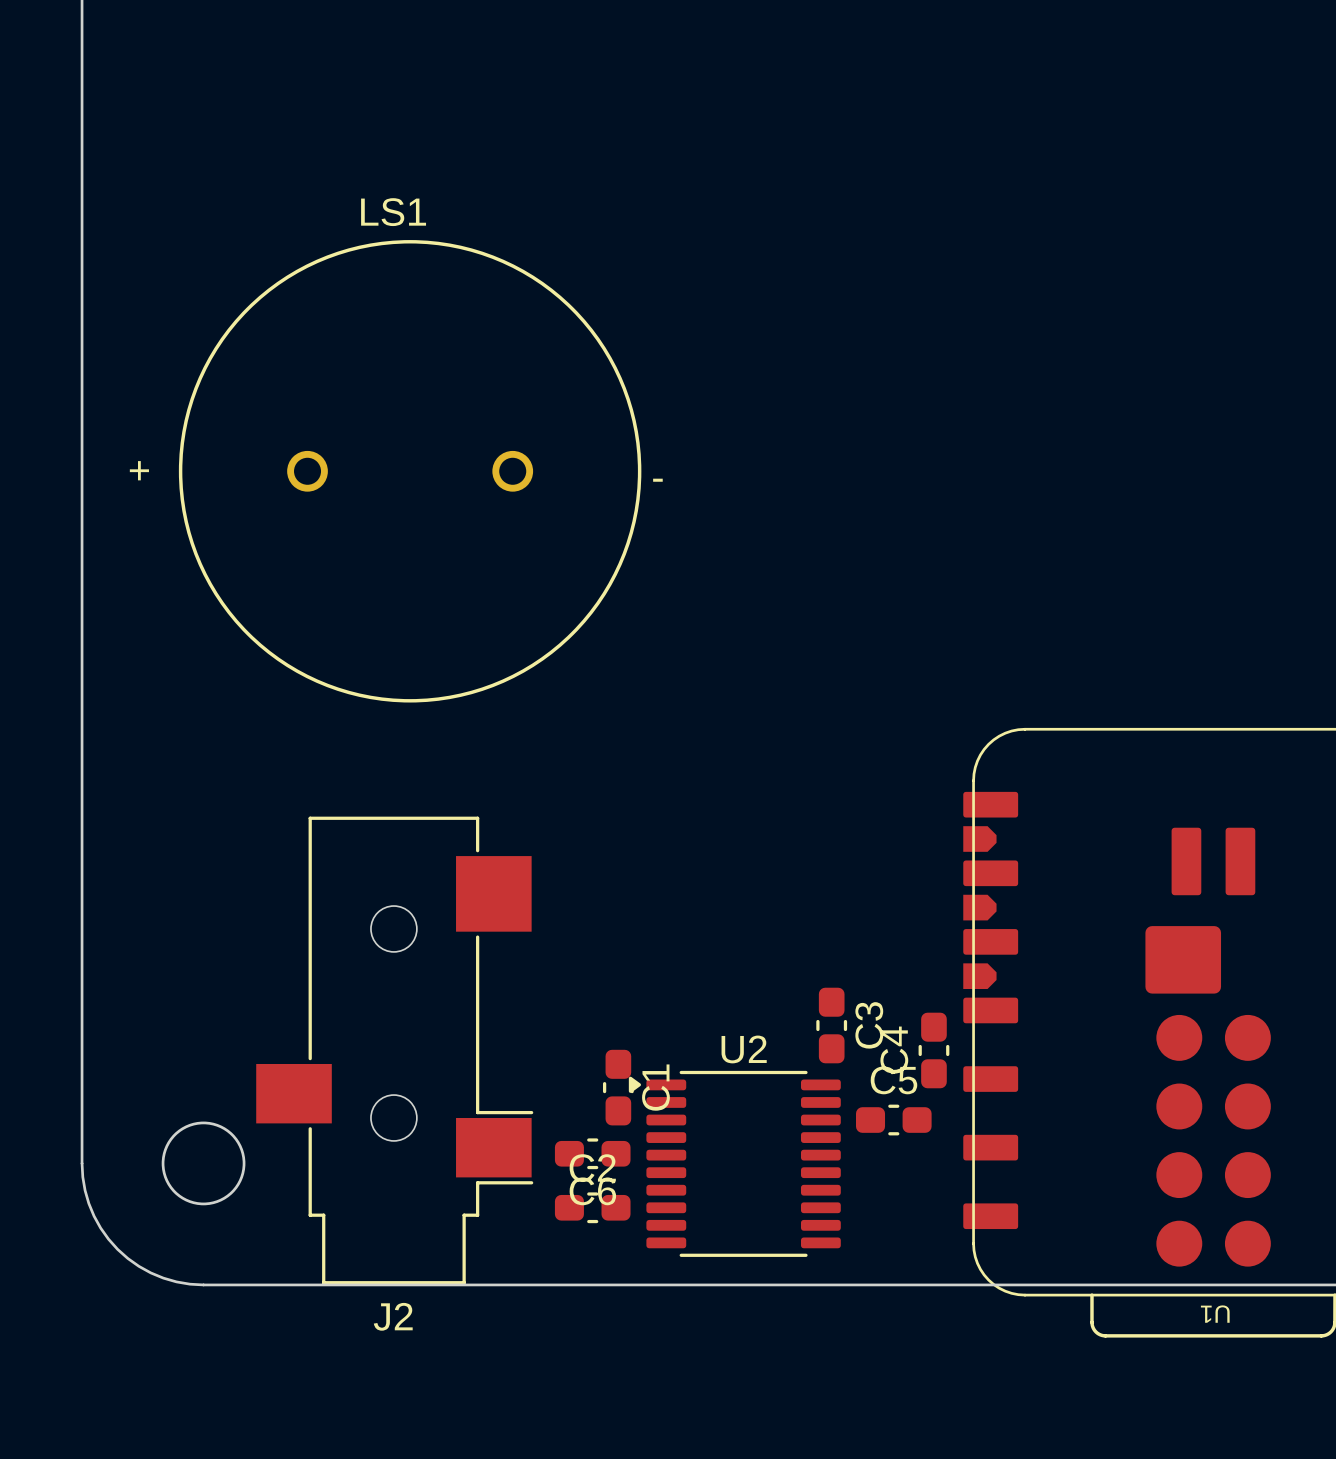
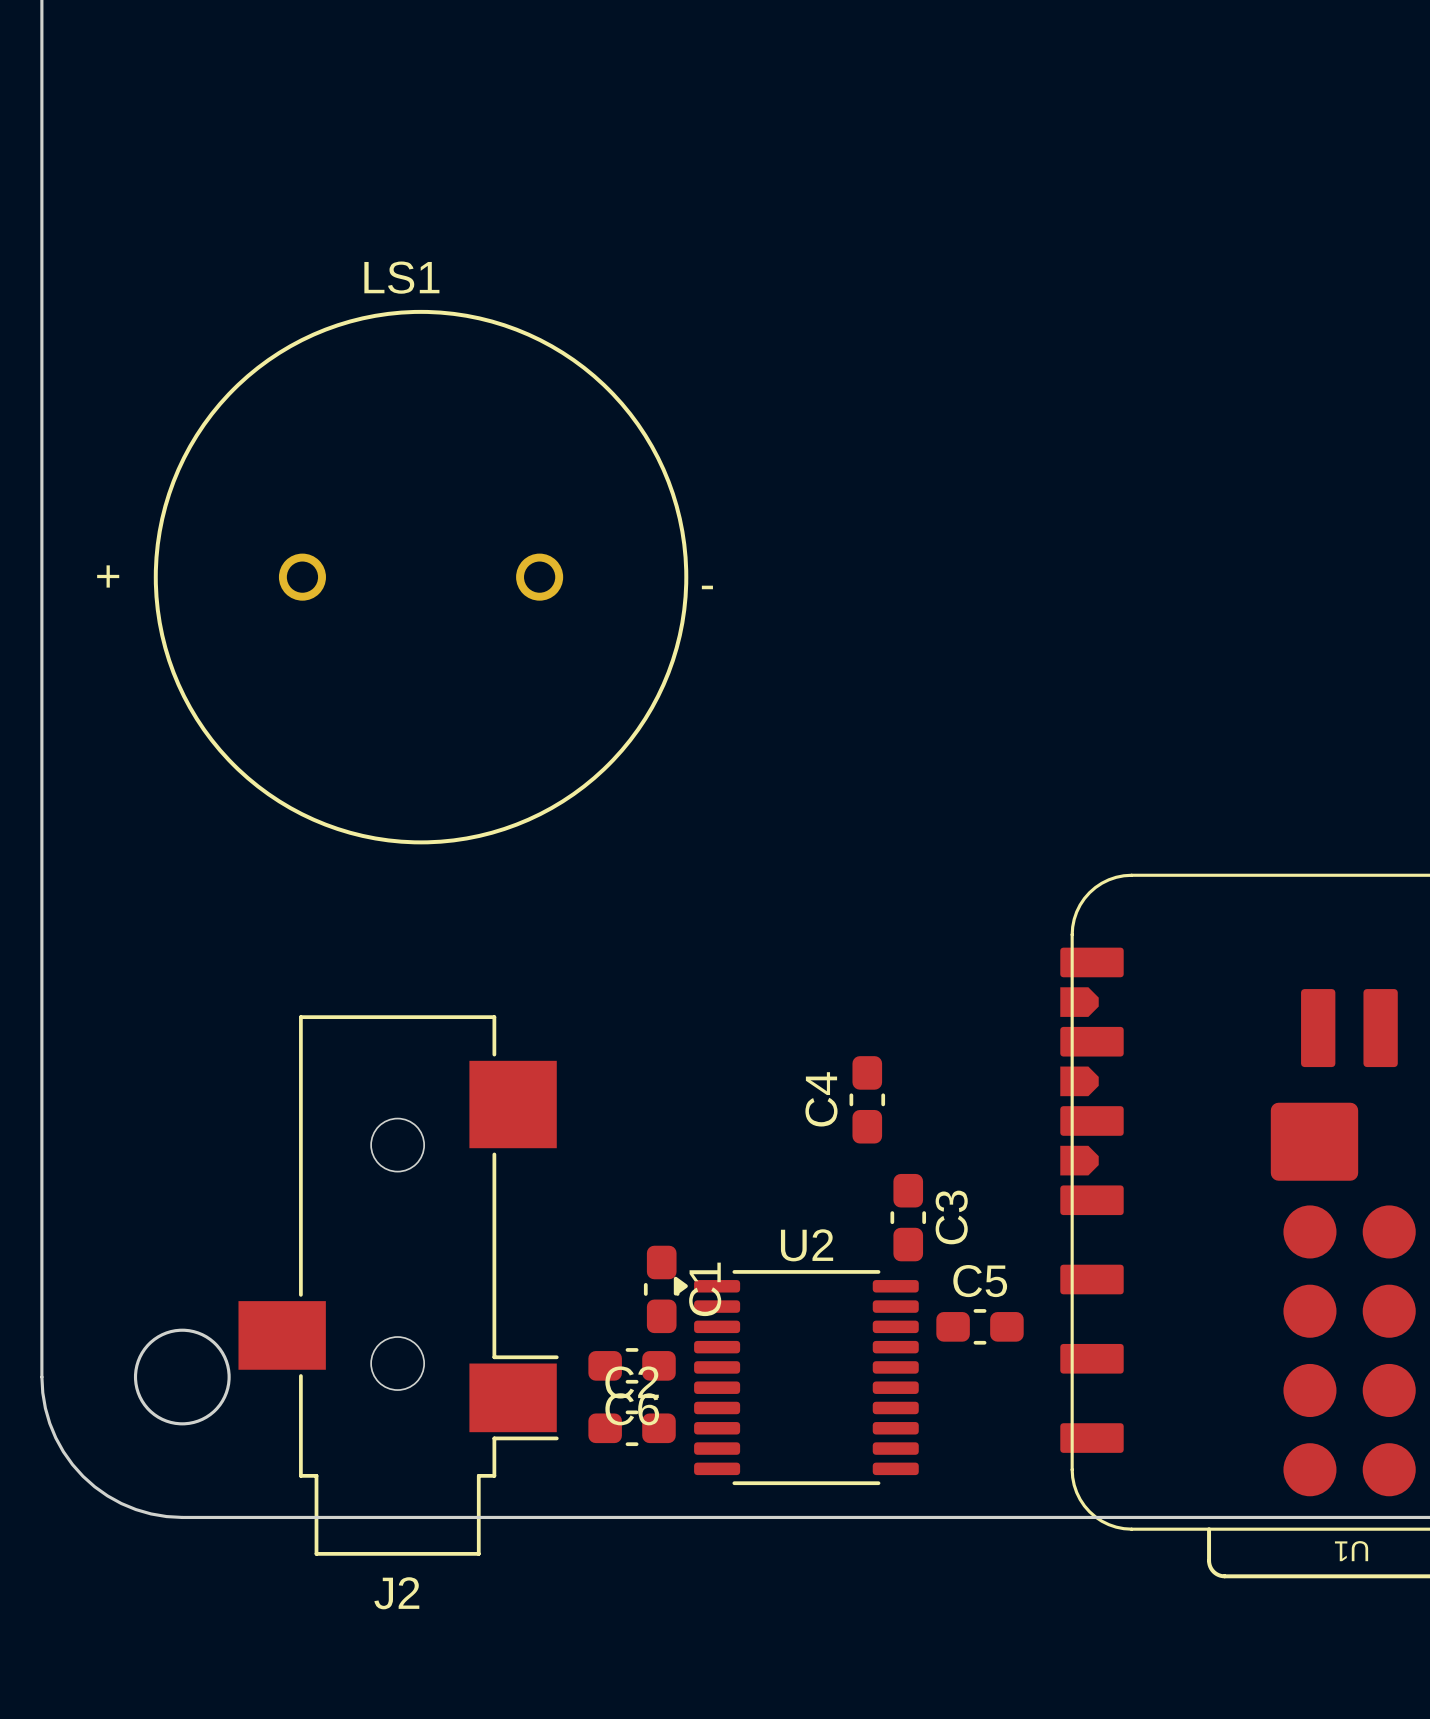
J2 position: (394, 1050) -> (398, 1285)
C4 position: (933, 1050) -> (867, 1099)

